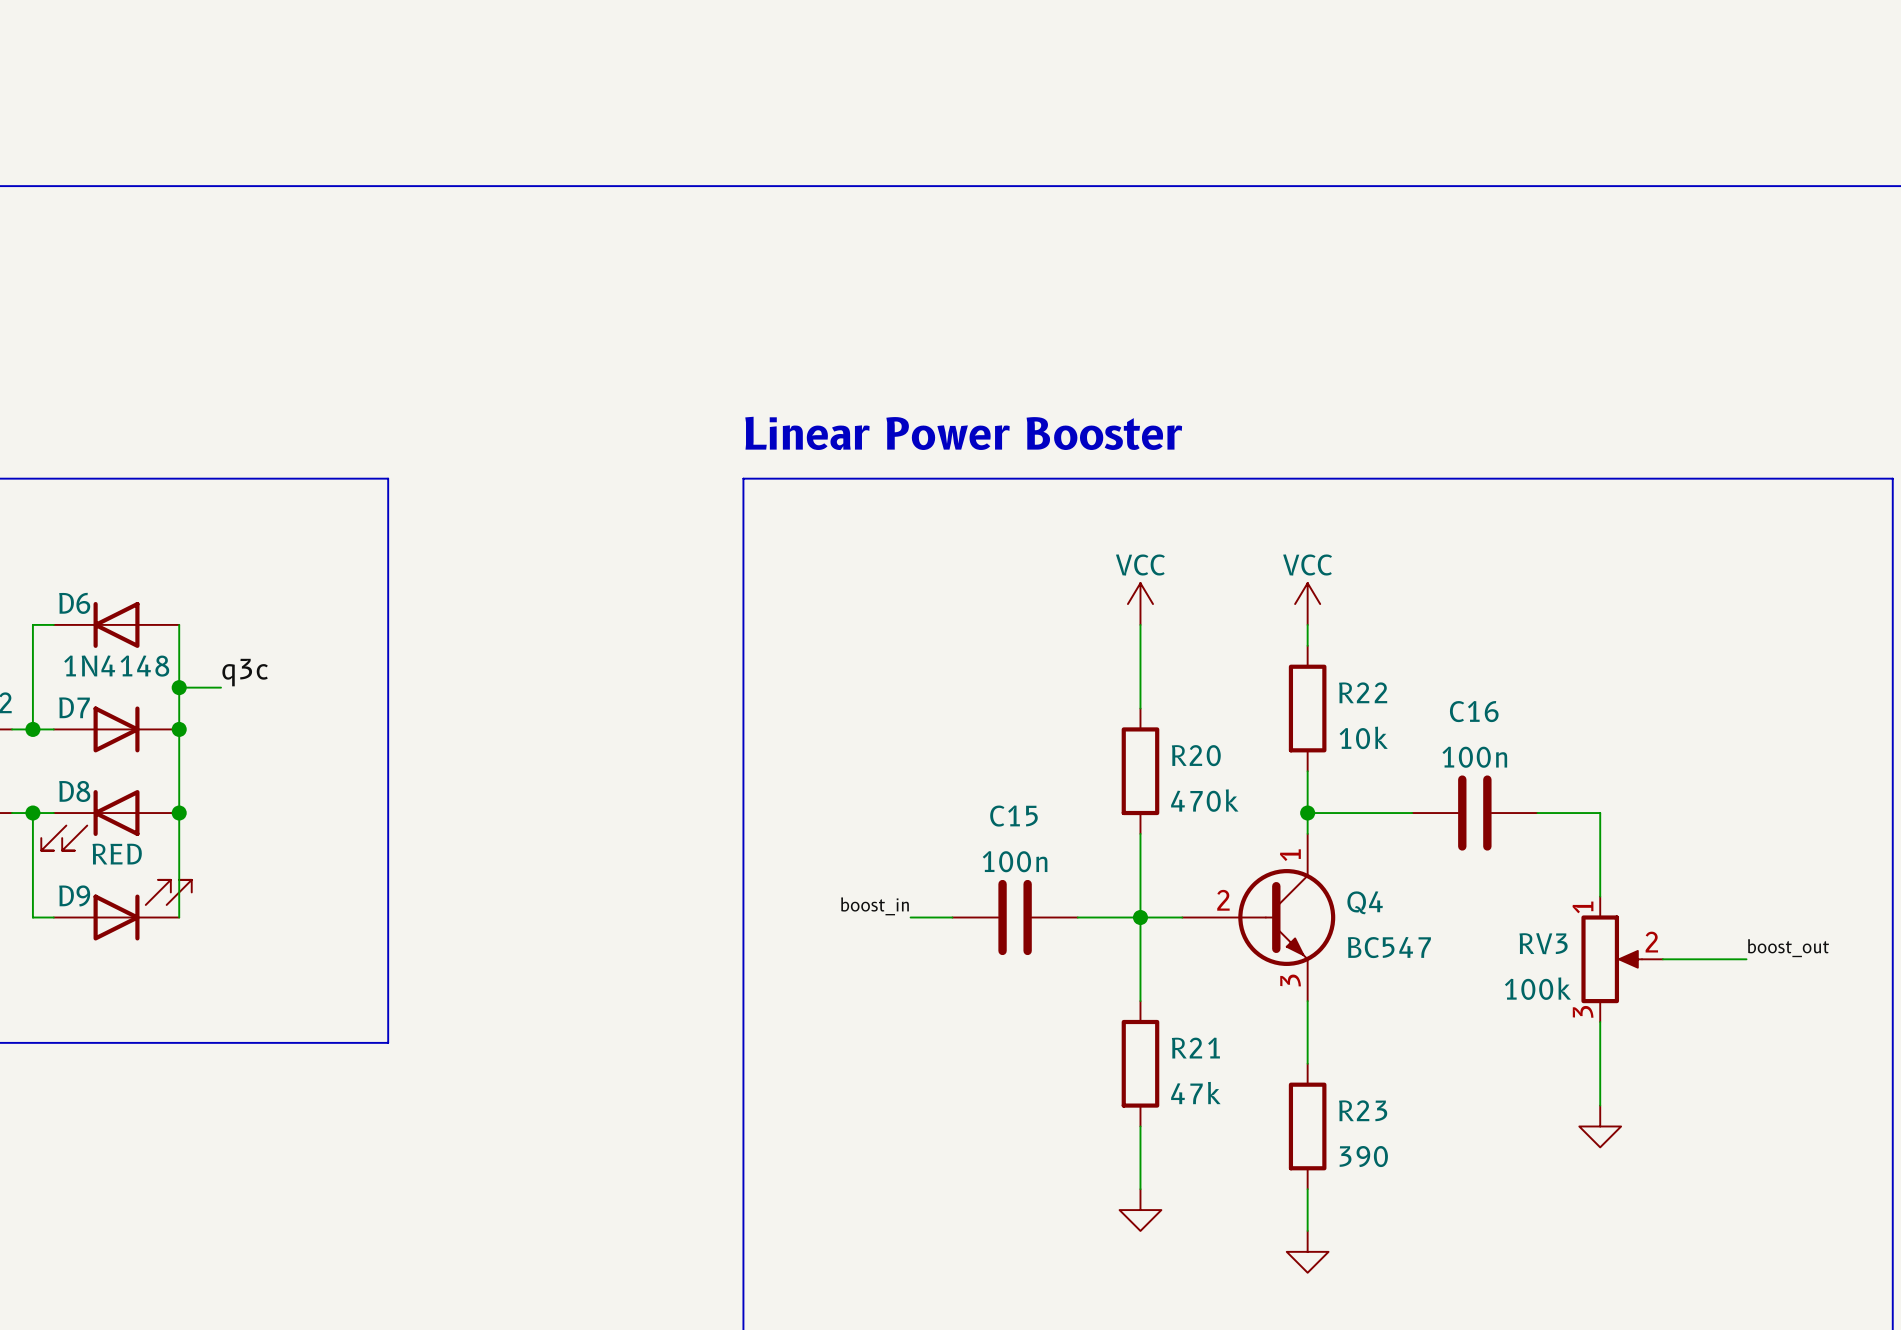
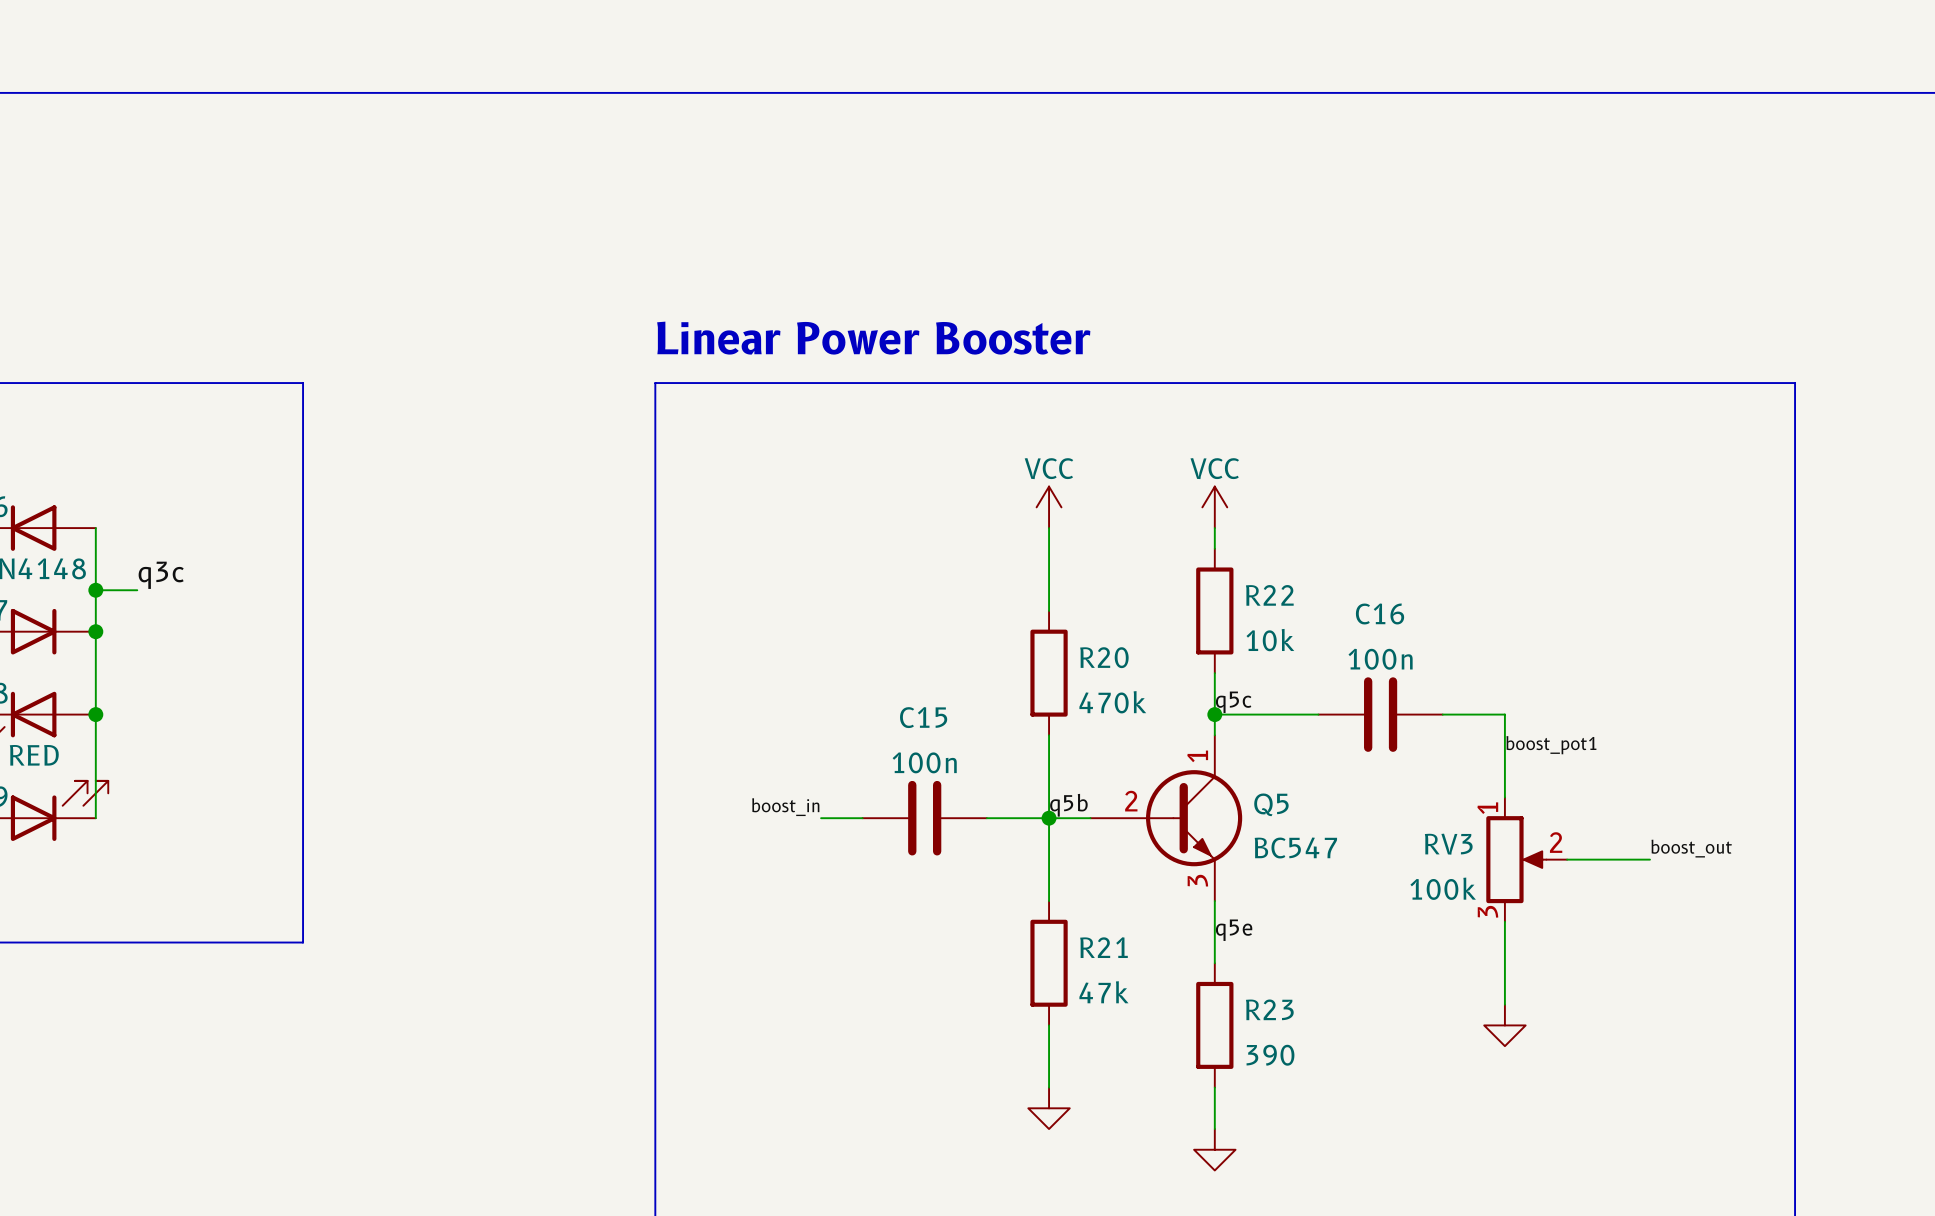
label: none -> q5c (1233, 702)
label: none -> boost_pot1 (1551, 745)
Q4 name: Q4 (1365, 902) -> Q5 (1271, 804)
label: none -> q5b (1068, 805)
label: none -> q5e (1234, 930)

